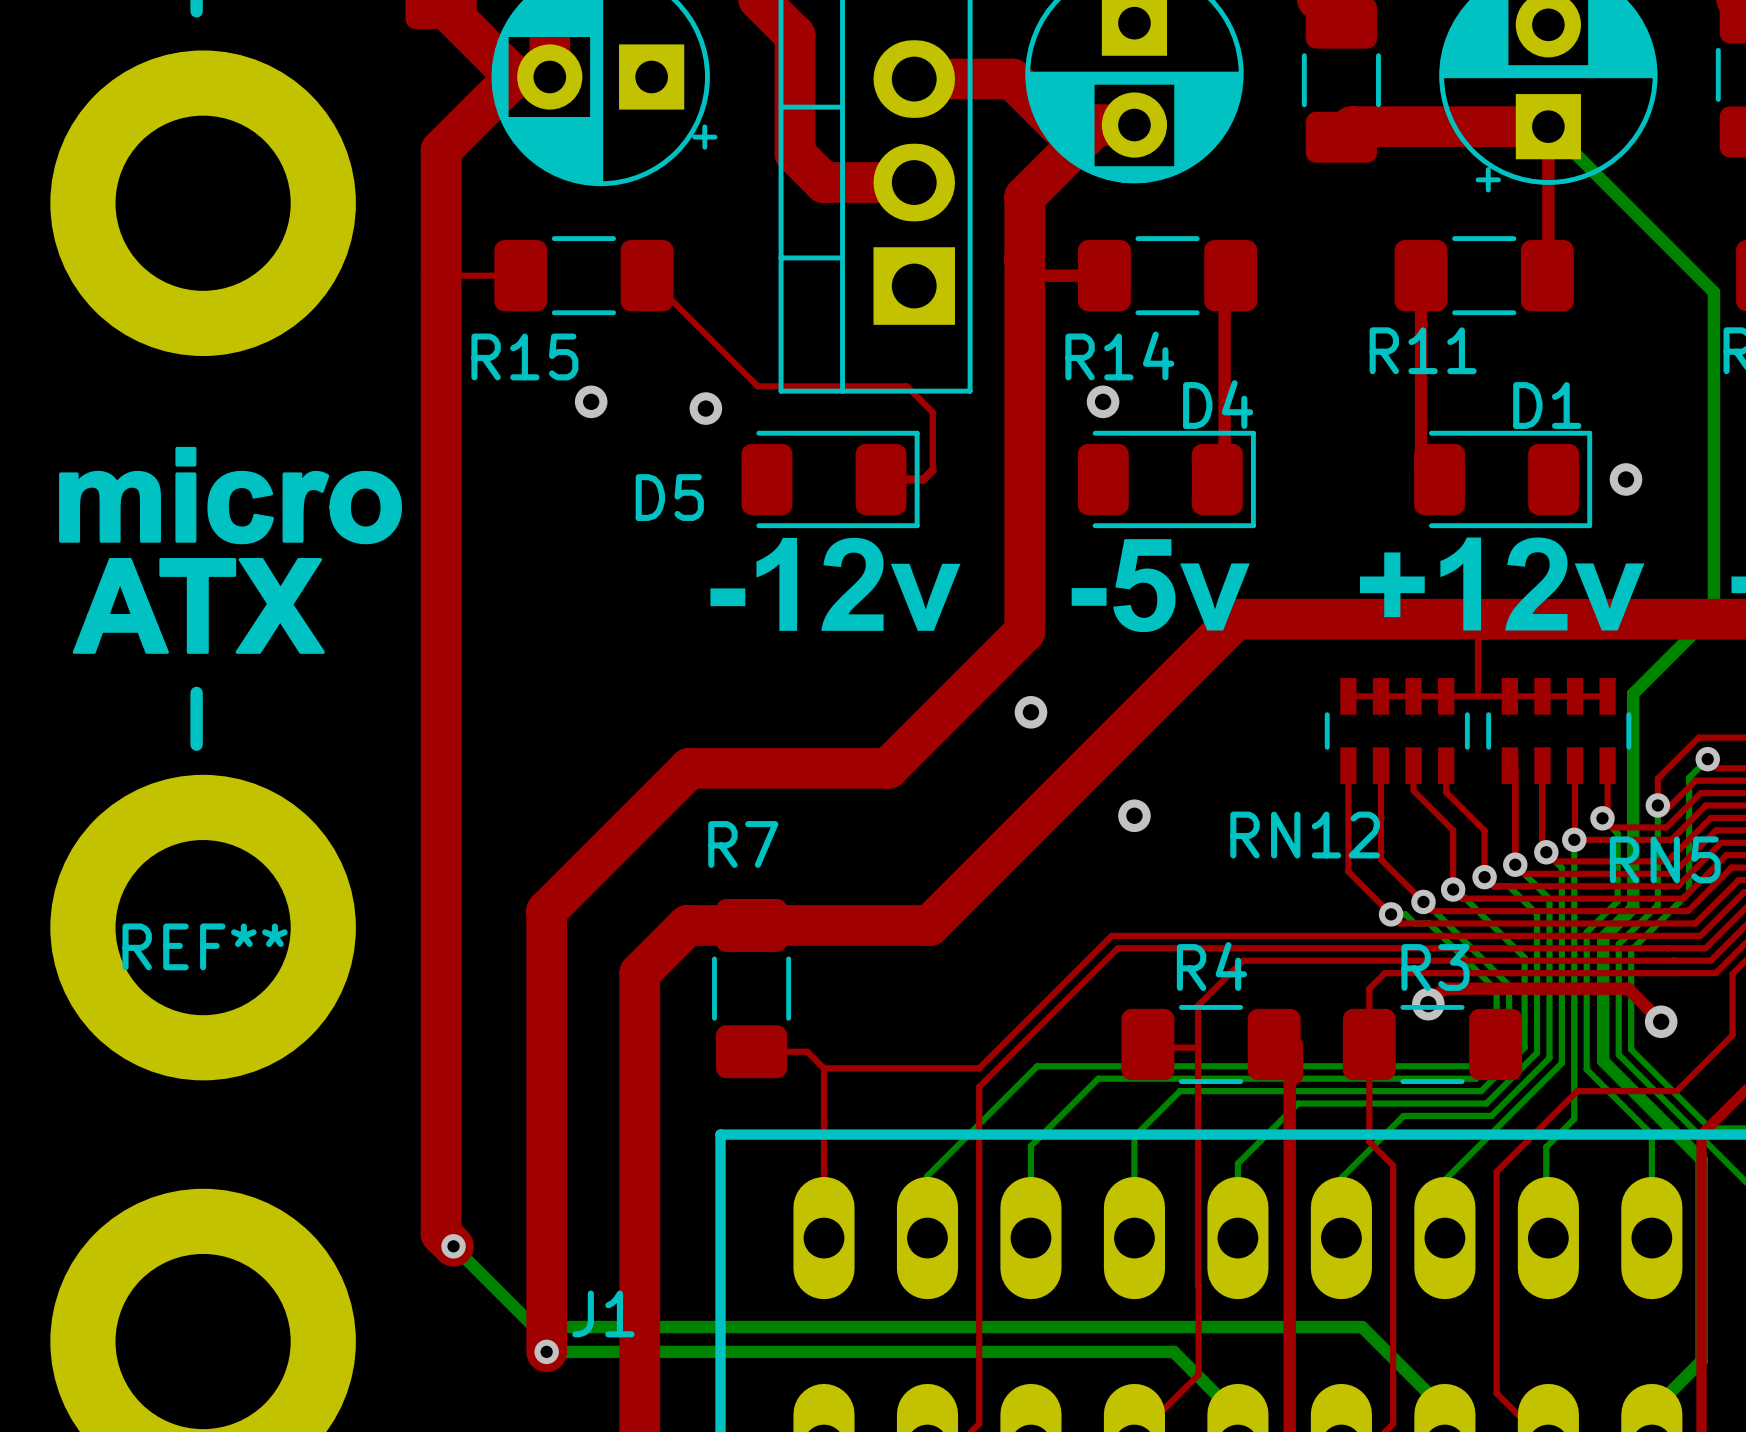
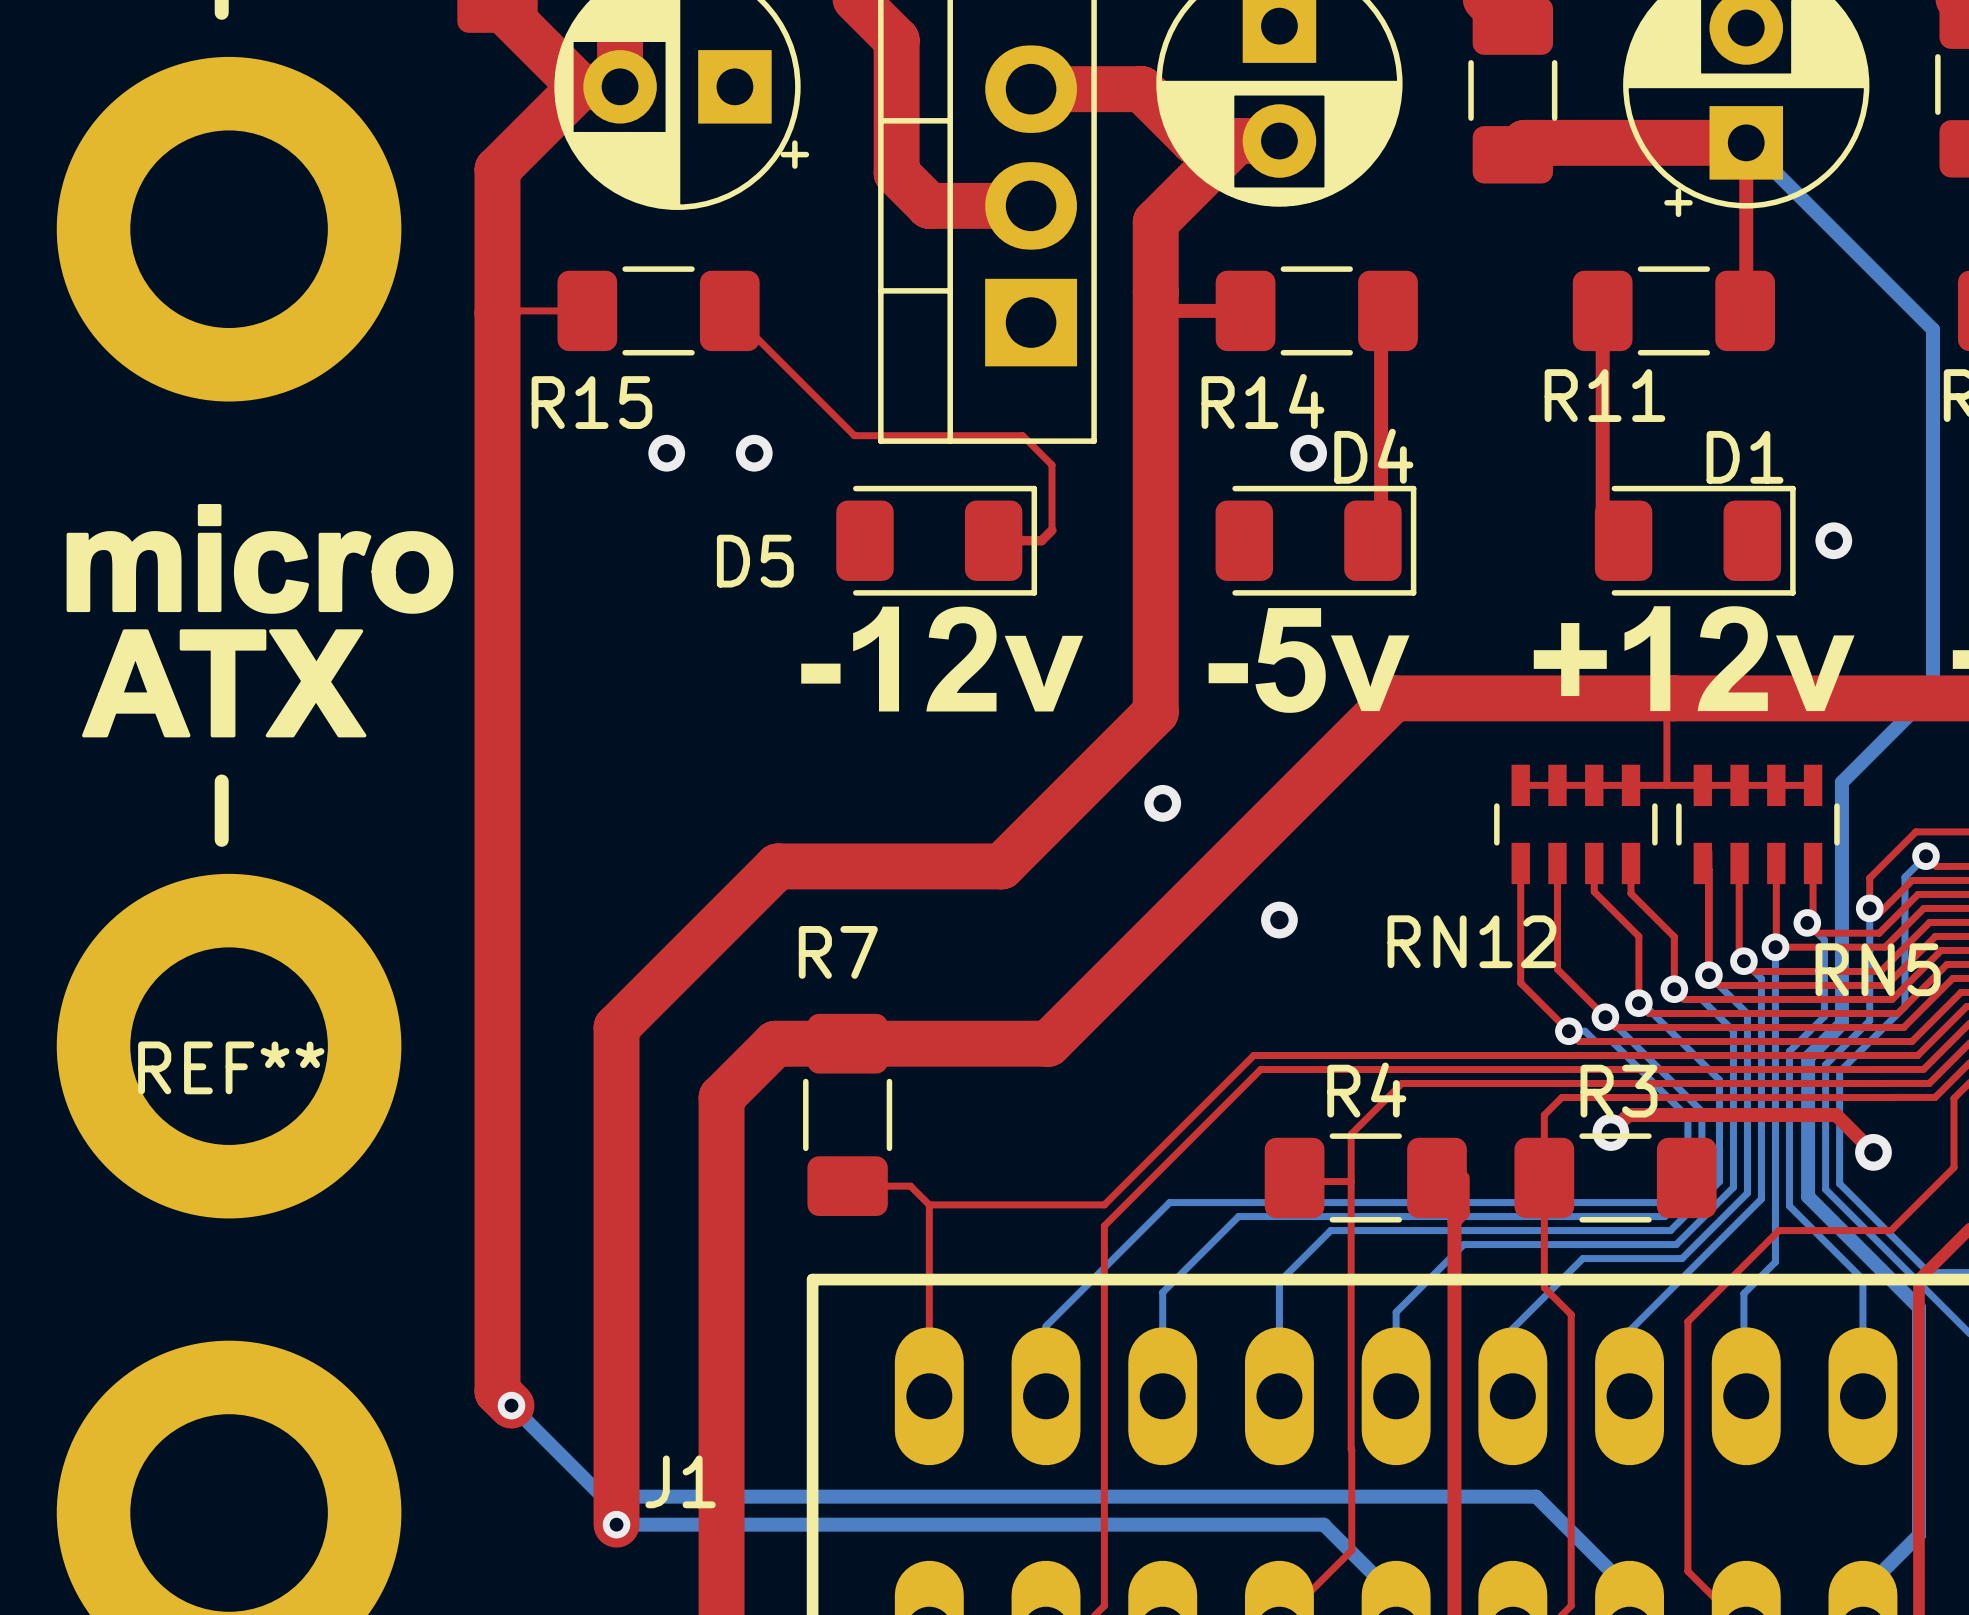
via position: (1103, 401) -> (1308, 453)
via position: (705, 408) -> (754, 453)

